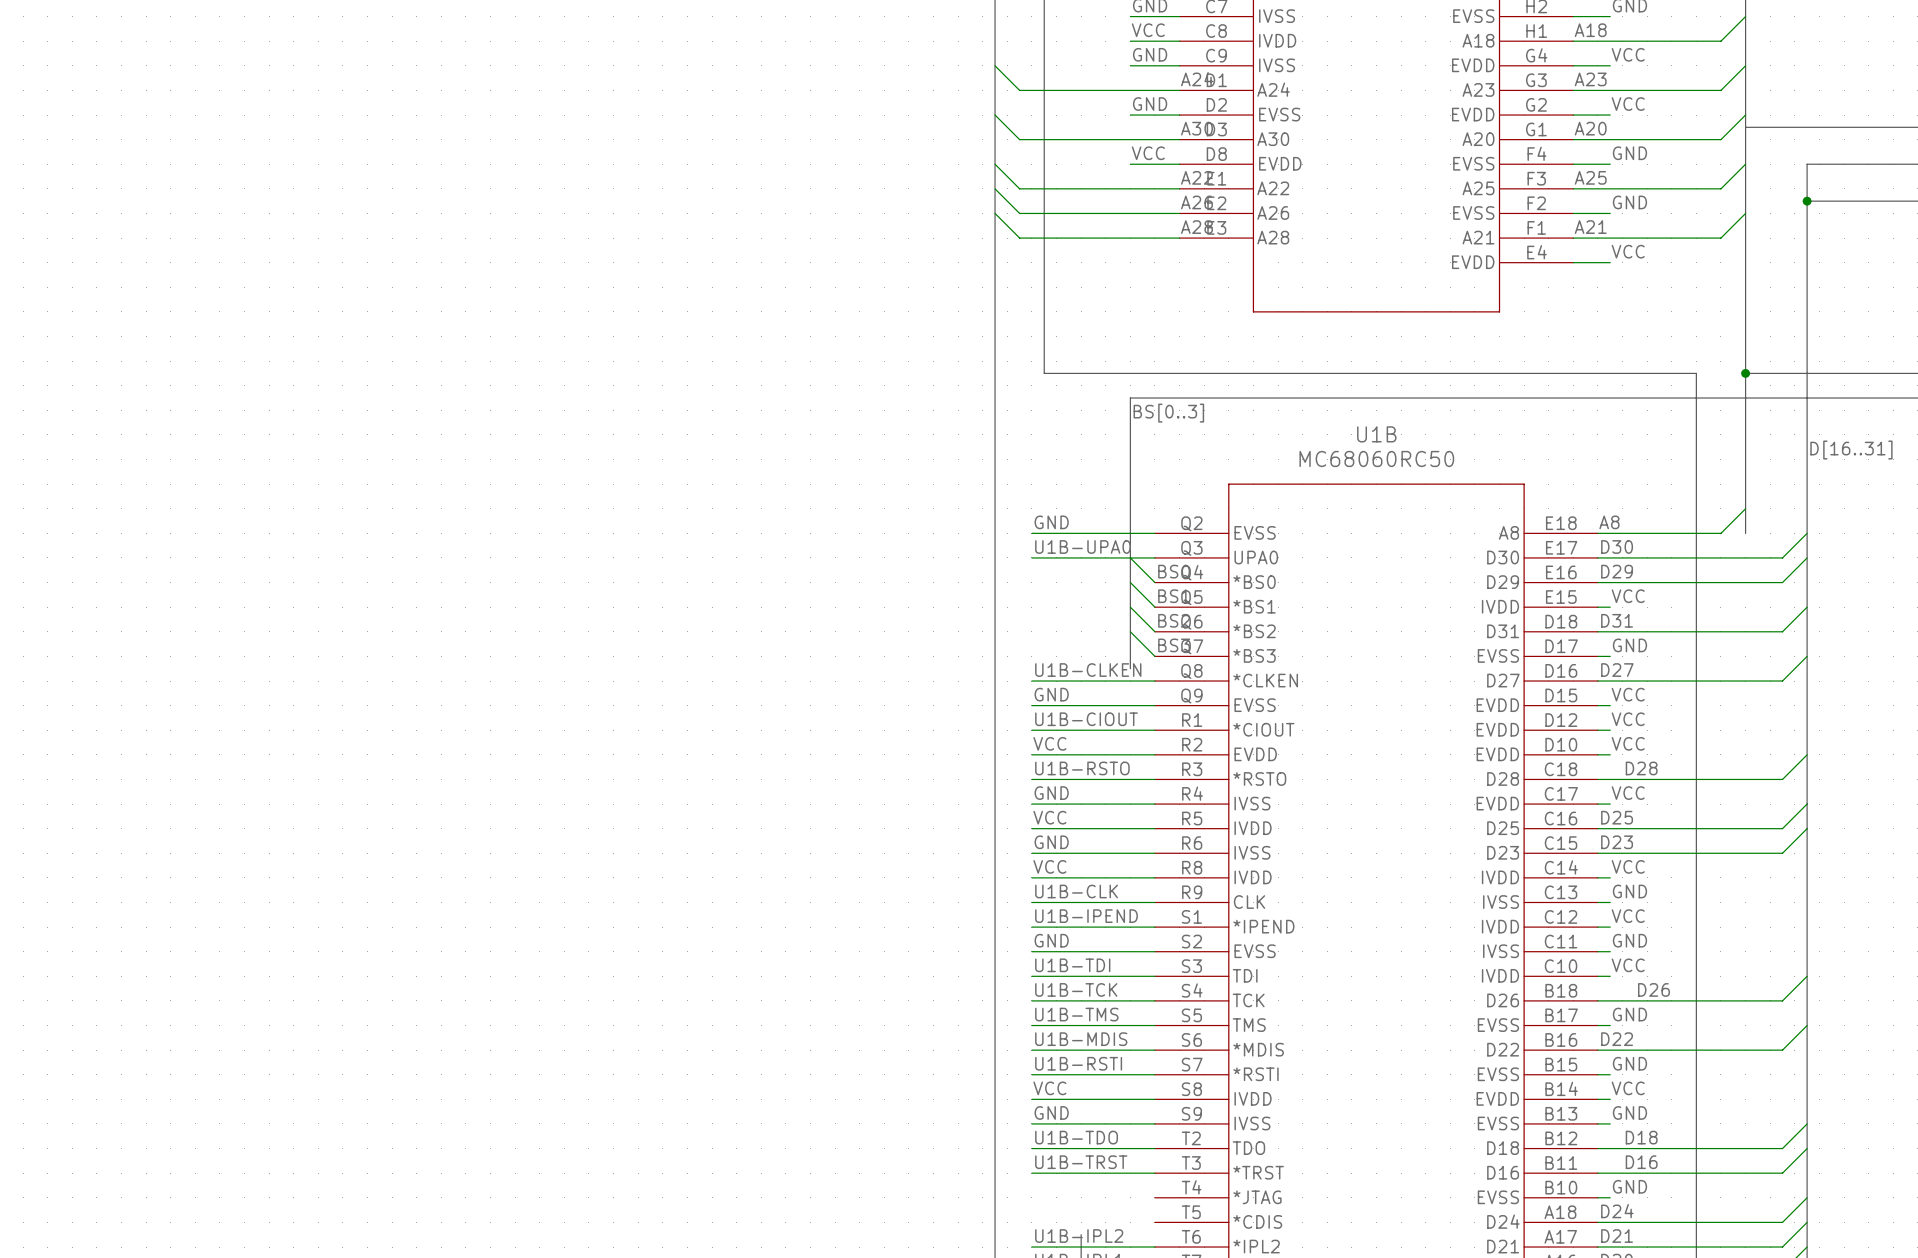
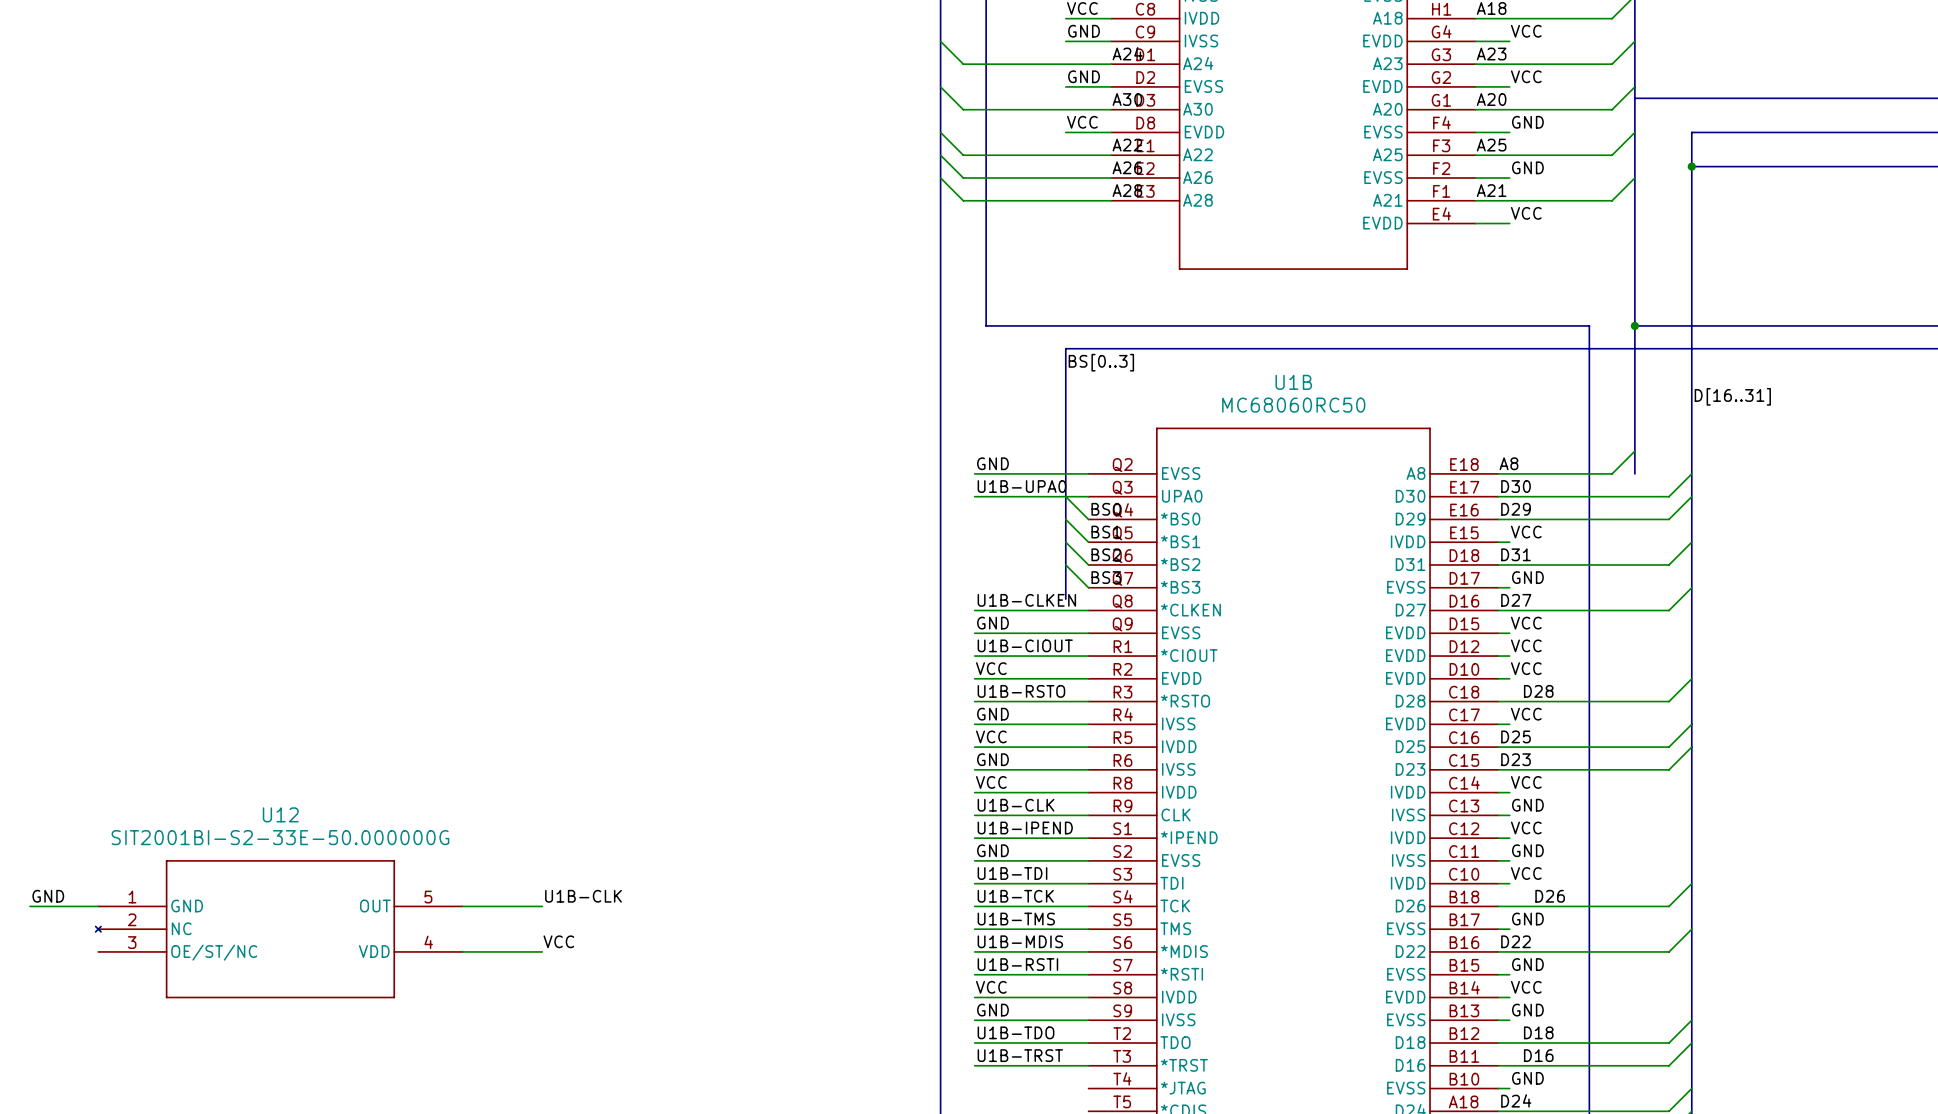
label: none -> GND (48, 896)
label: none -> U1B-CLK (583, 896)
wire: none -> (30, 906) (98, 906)
wire: none -> (462, 906) (542, 906)
U12: none -> SIT2001BI-S2-33E-50.000000G (279, 929)
label: none -> VCC (558, 941)
wire: none -> (462, 951) (542, 951)

